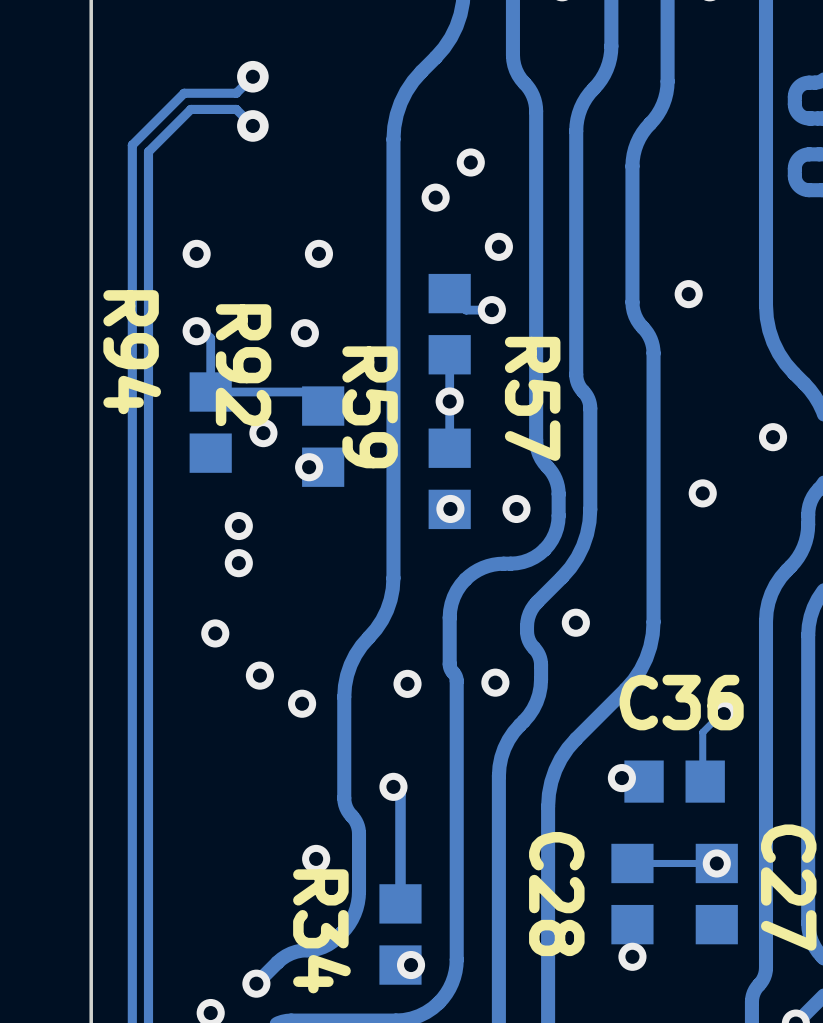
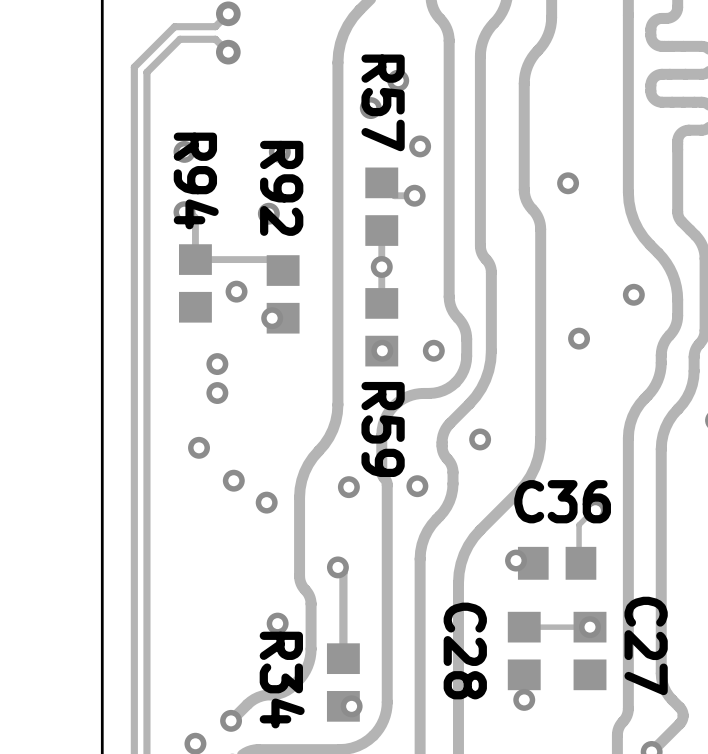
R94 name position: R94 (132, 352) -> R94 (196, 180)
R92 name position: R92 (243, 365) -> R92 (281, 188)
R57 name position: R57 (532, 398) -> R57 (383, 102)
R59 name position: R59 (370, 407) -> R59 (383, 429)

